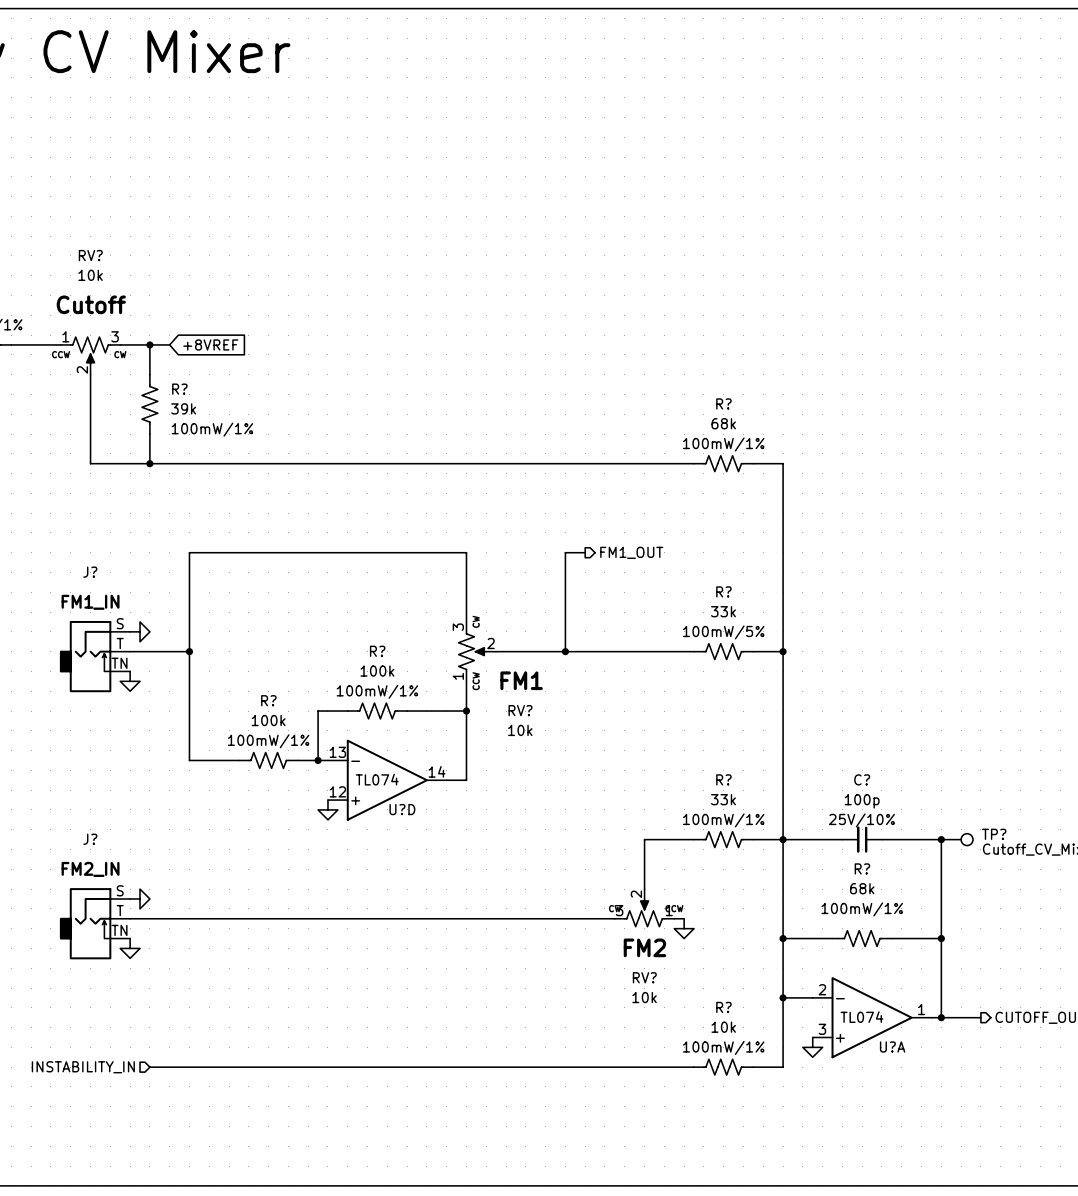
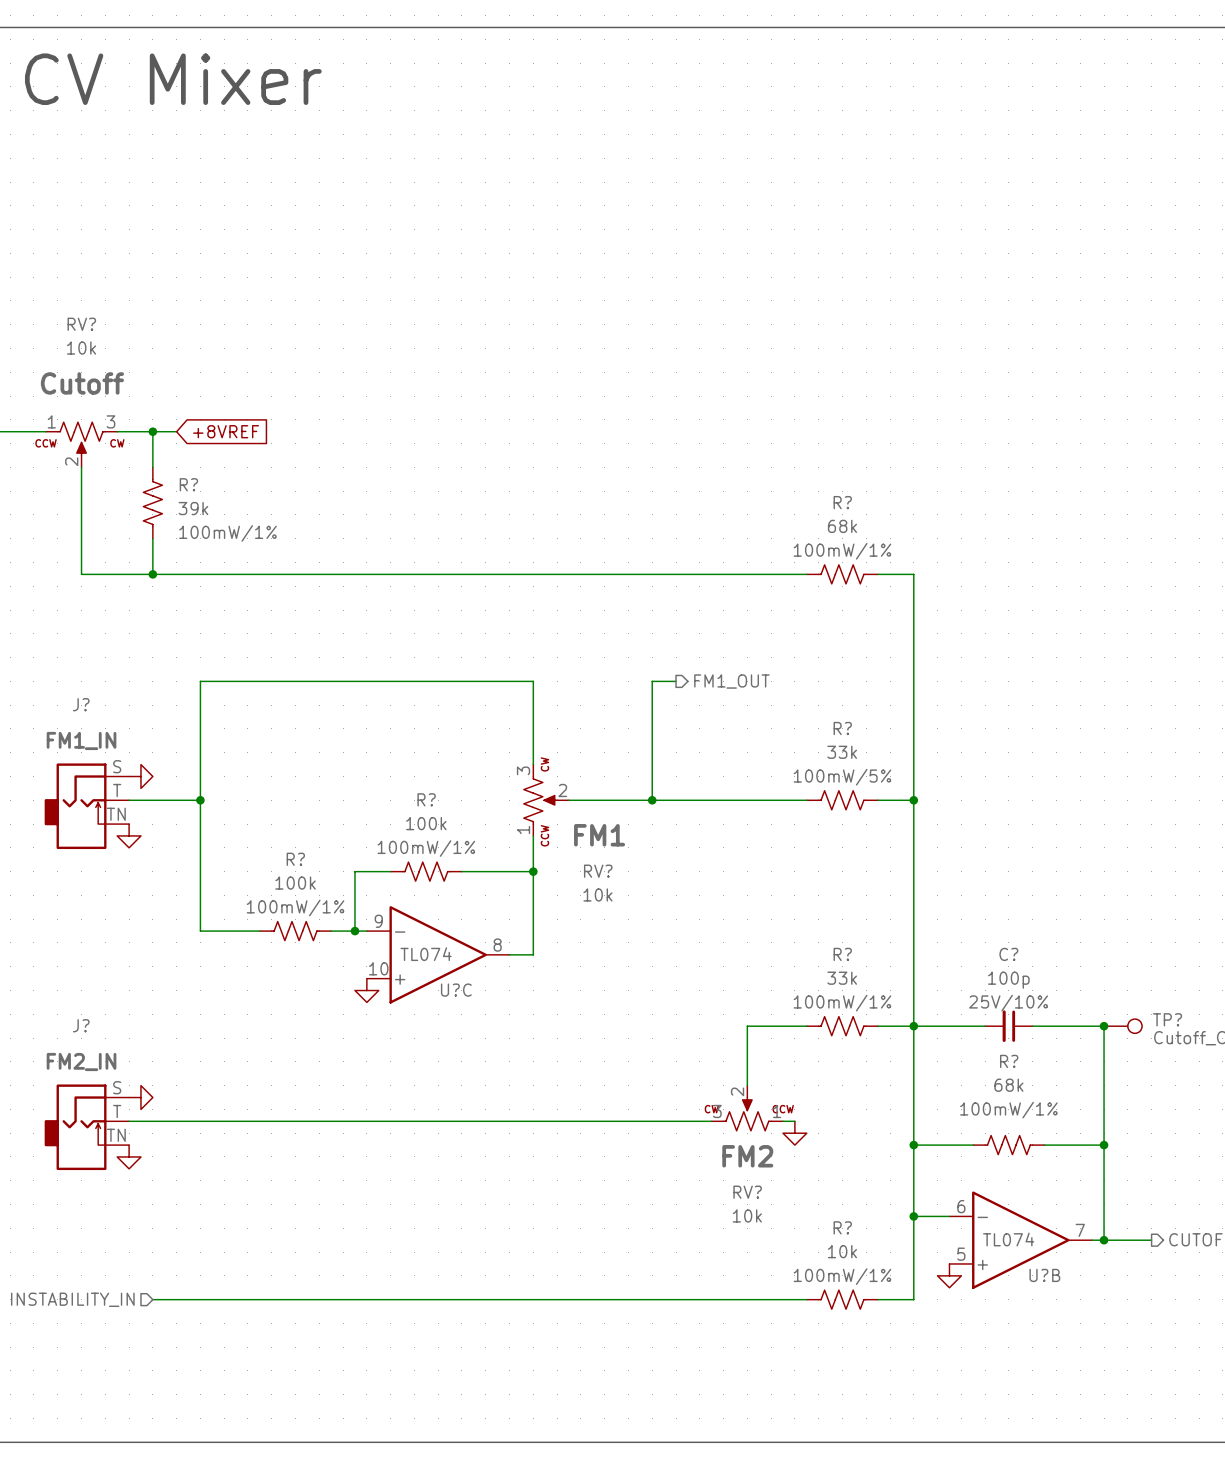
U?D pin number: 13 (337, 752) -> 9 (378, 921)
U?D pin number: 14 (437, 771) -> 8 (497, 945)
U?D pin number: 12 (337, 791) -> 10 (378, 968)
U?D name: U?D (402, 809) -> U?C (456, 990)
U?A pin number: 2 (822, 989) -> 6 (961, 1206)
U?A pin number: 1 (921, 1009) -> 7 (1080, 1230)
U?A pin number: 3 (822, 1029) -> 5 (961, 1254)
U?A name: U?A (892, 1047) -> U?B (1044, 1275)

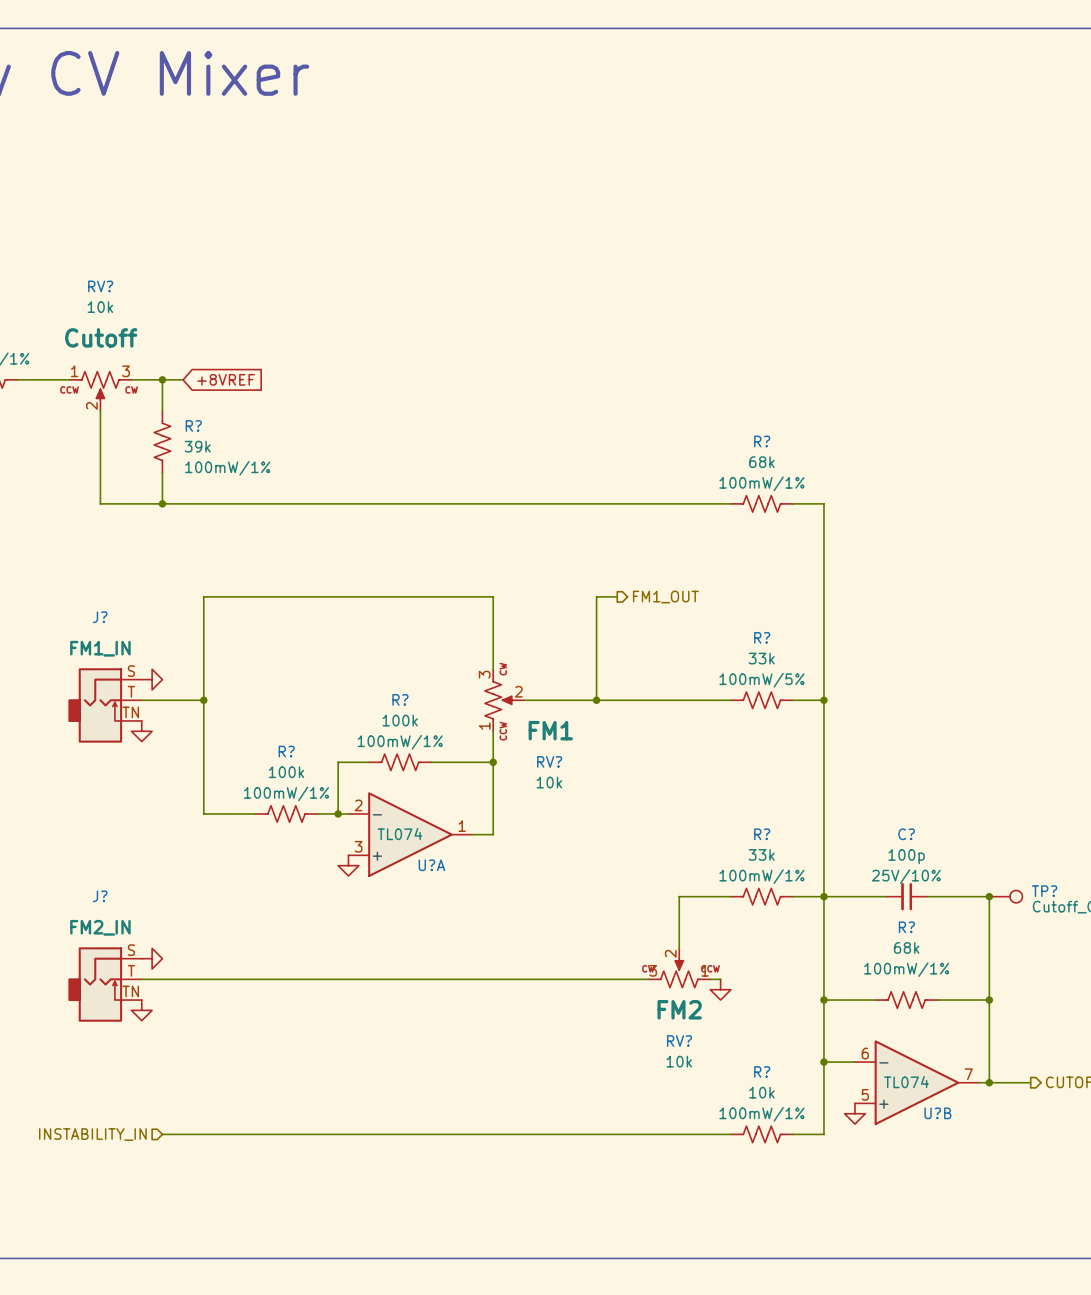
U?C pin number: 9 (378, 921) -> 2 (358, 805)
U?C pin number: 8 (497, 945) -> 1 (462, 826)
U?C pin number: 10 (378, 968) -> 3 (358, 846)
U?C name: U?C (456, 990) -> U?A (431, 865)

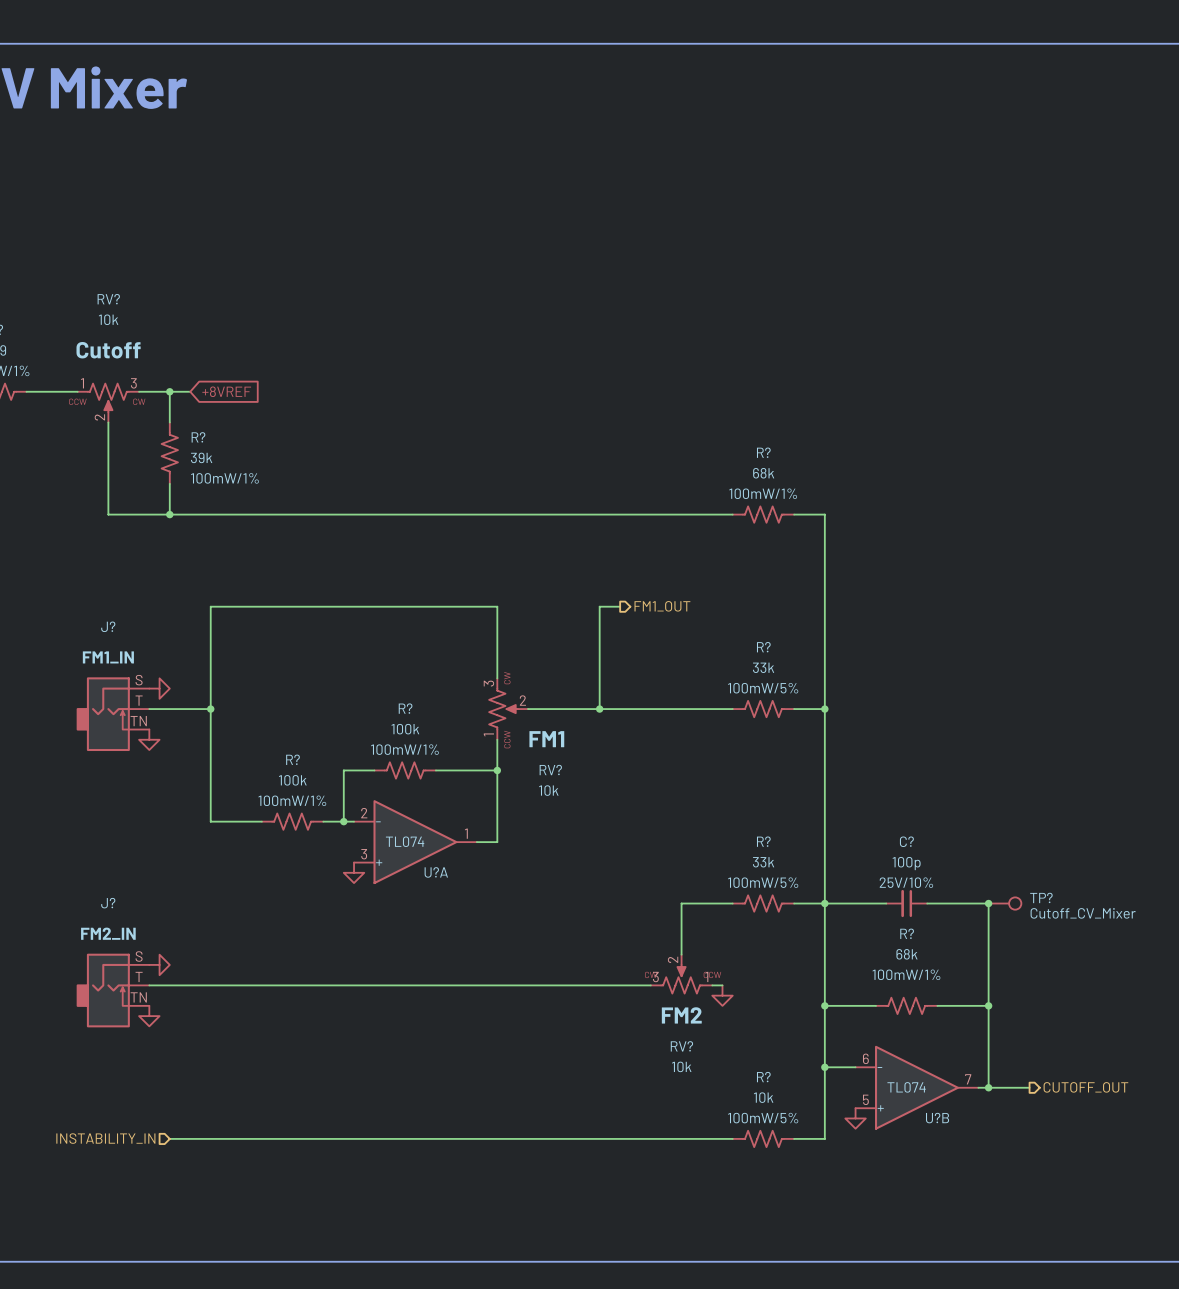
R? text: 100mW/1% (761, 876) -> 100mW/5% (763, 882)
R? text: 100mW/1% (761, 1114) -> 100mW/5% (763, 1118)

